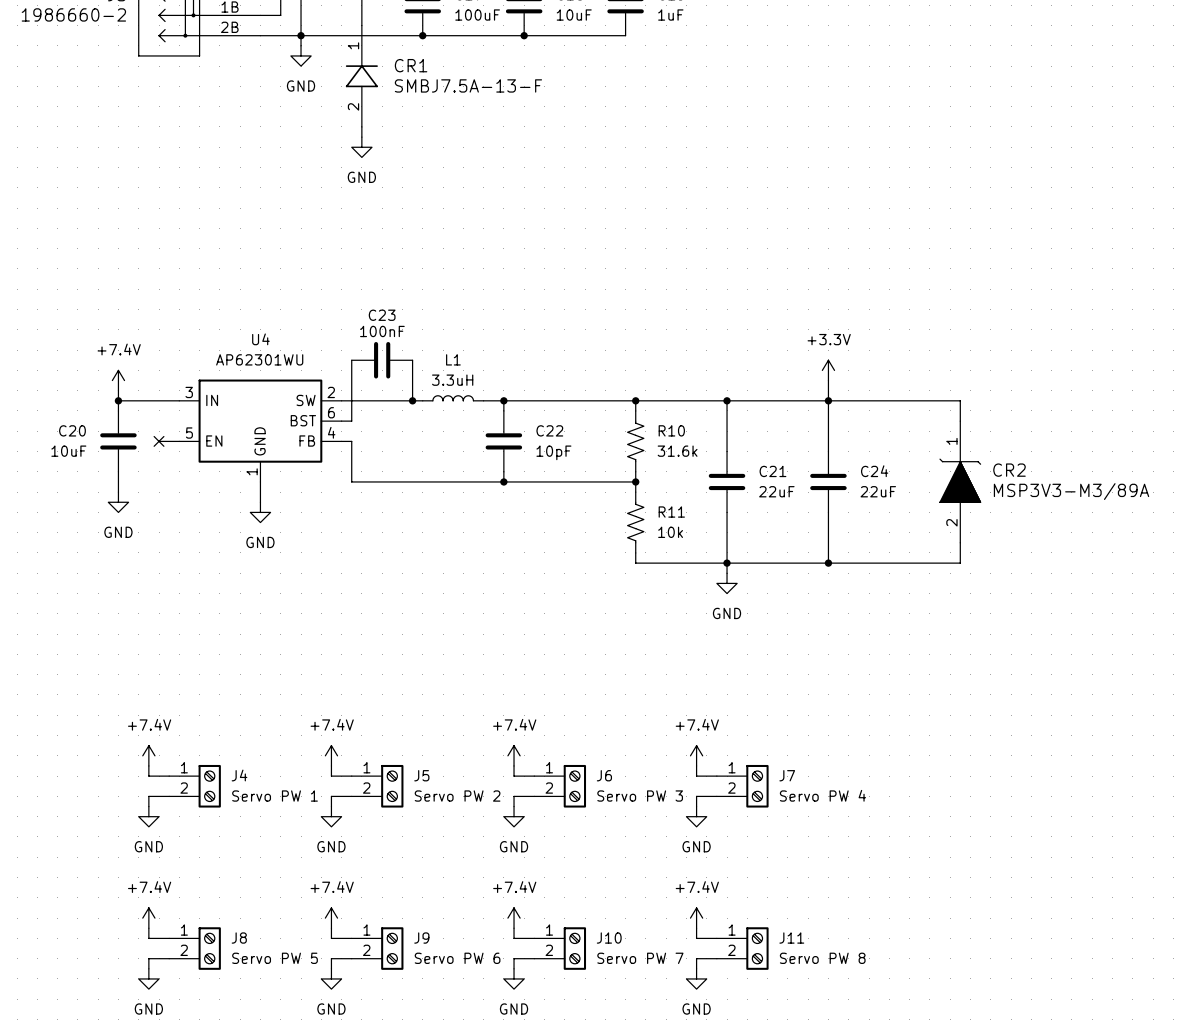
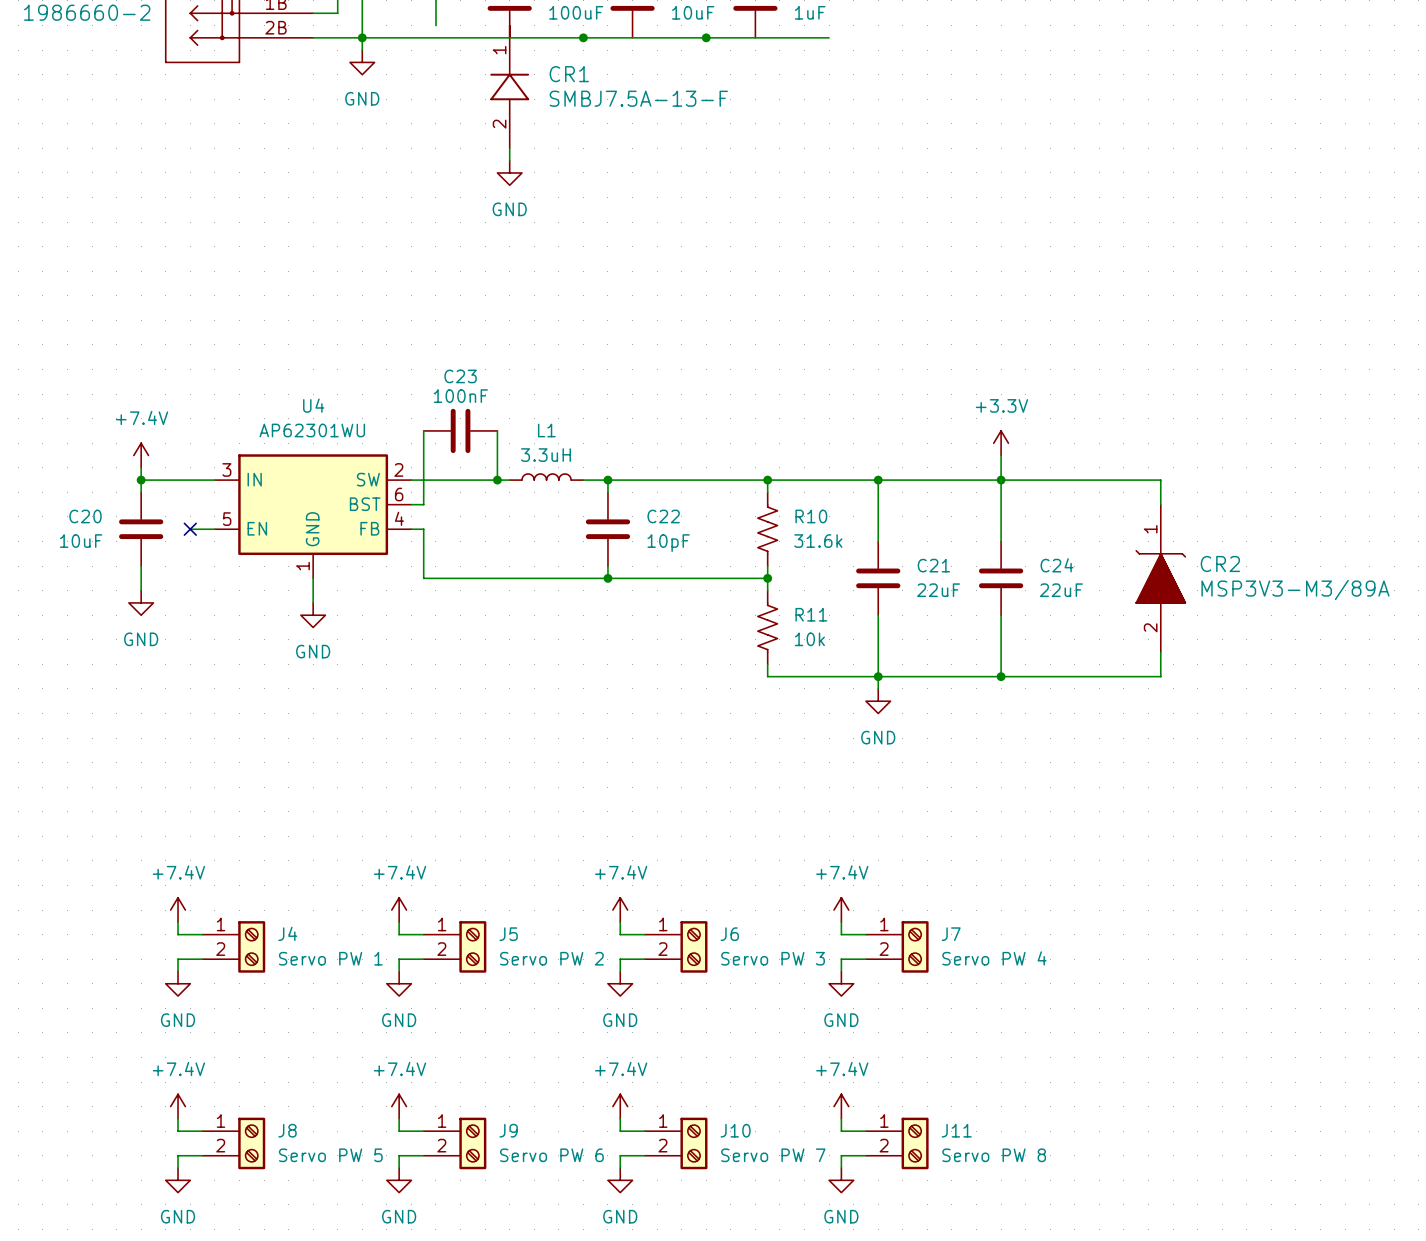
junction: (422, 35) -> none
junction: none -> (583, 37)
junction: (524, 35) -> none
junction: none -> (706, 37)
wire: none -> (755, 37) (829, 37)
CR1 position: (361, 76) -> (509, 86)
wire: (361, 126) (361, 137) -> (509, 148) (509, 160)
power symbol position: GND (361, 147) -> GND (509, 172)

